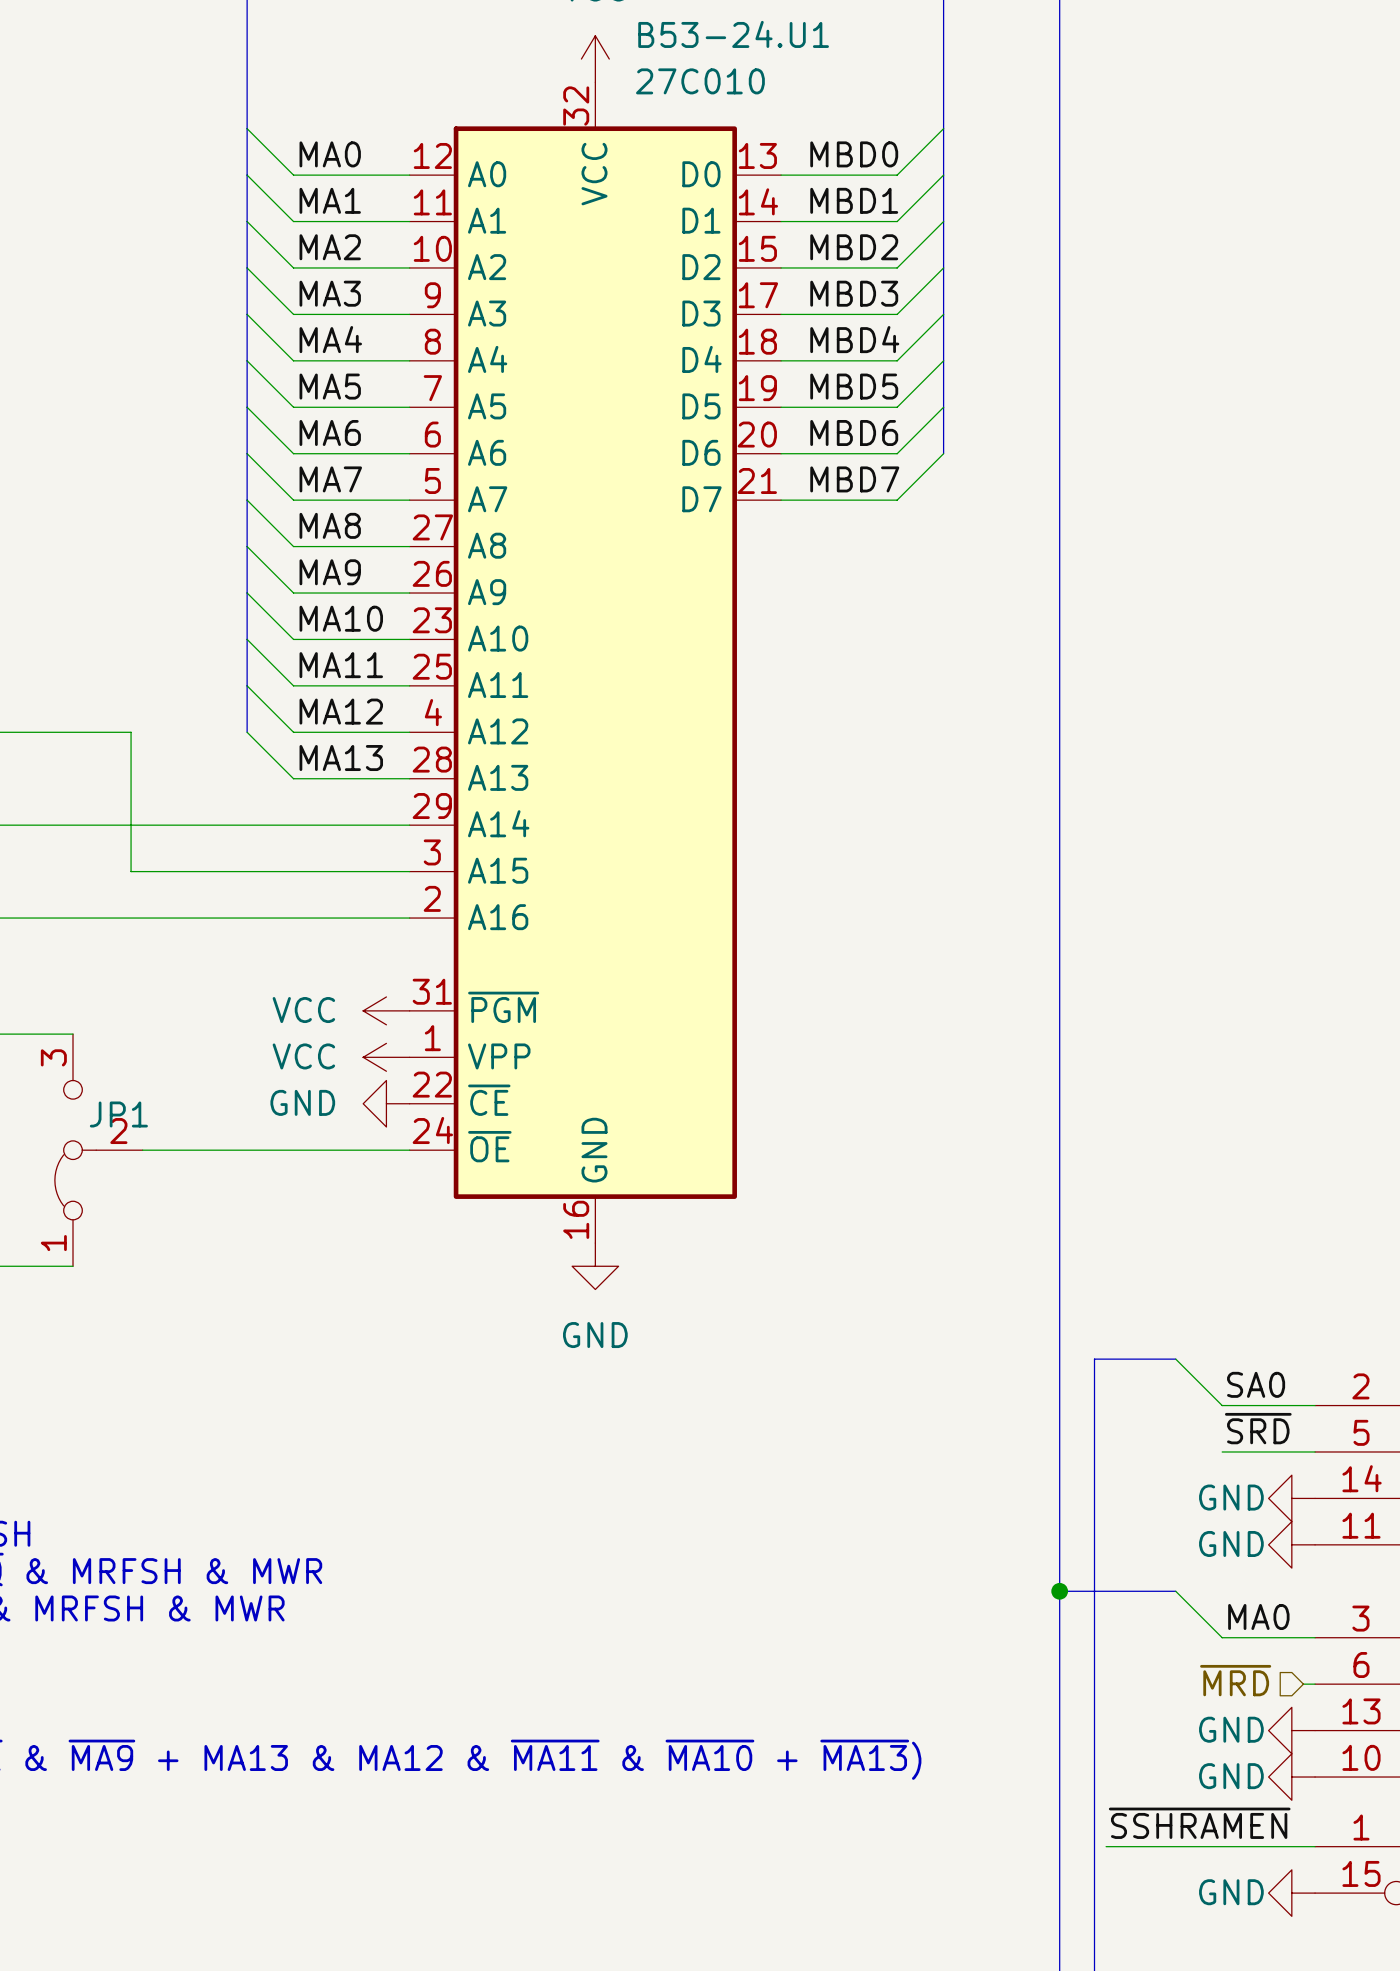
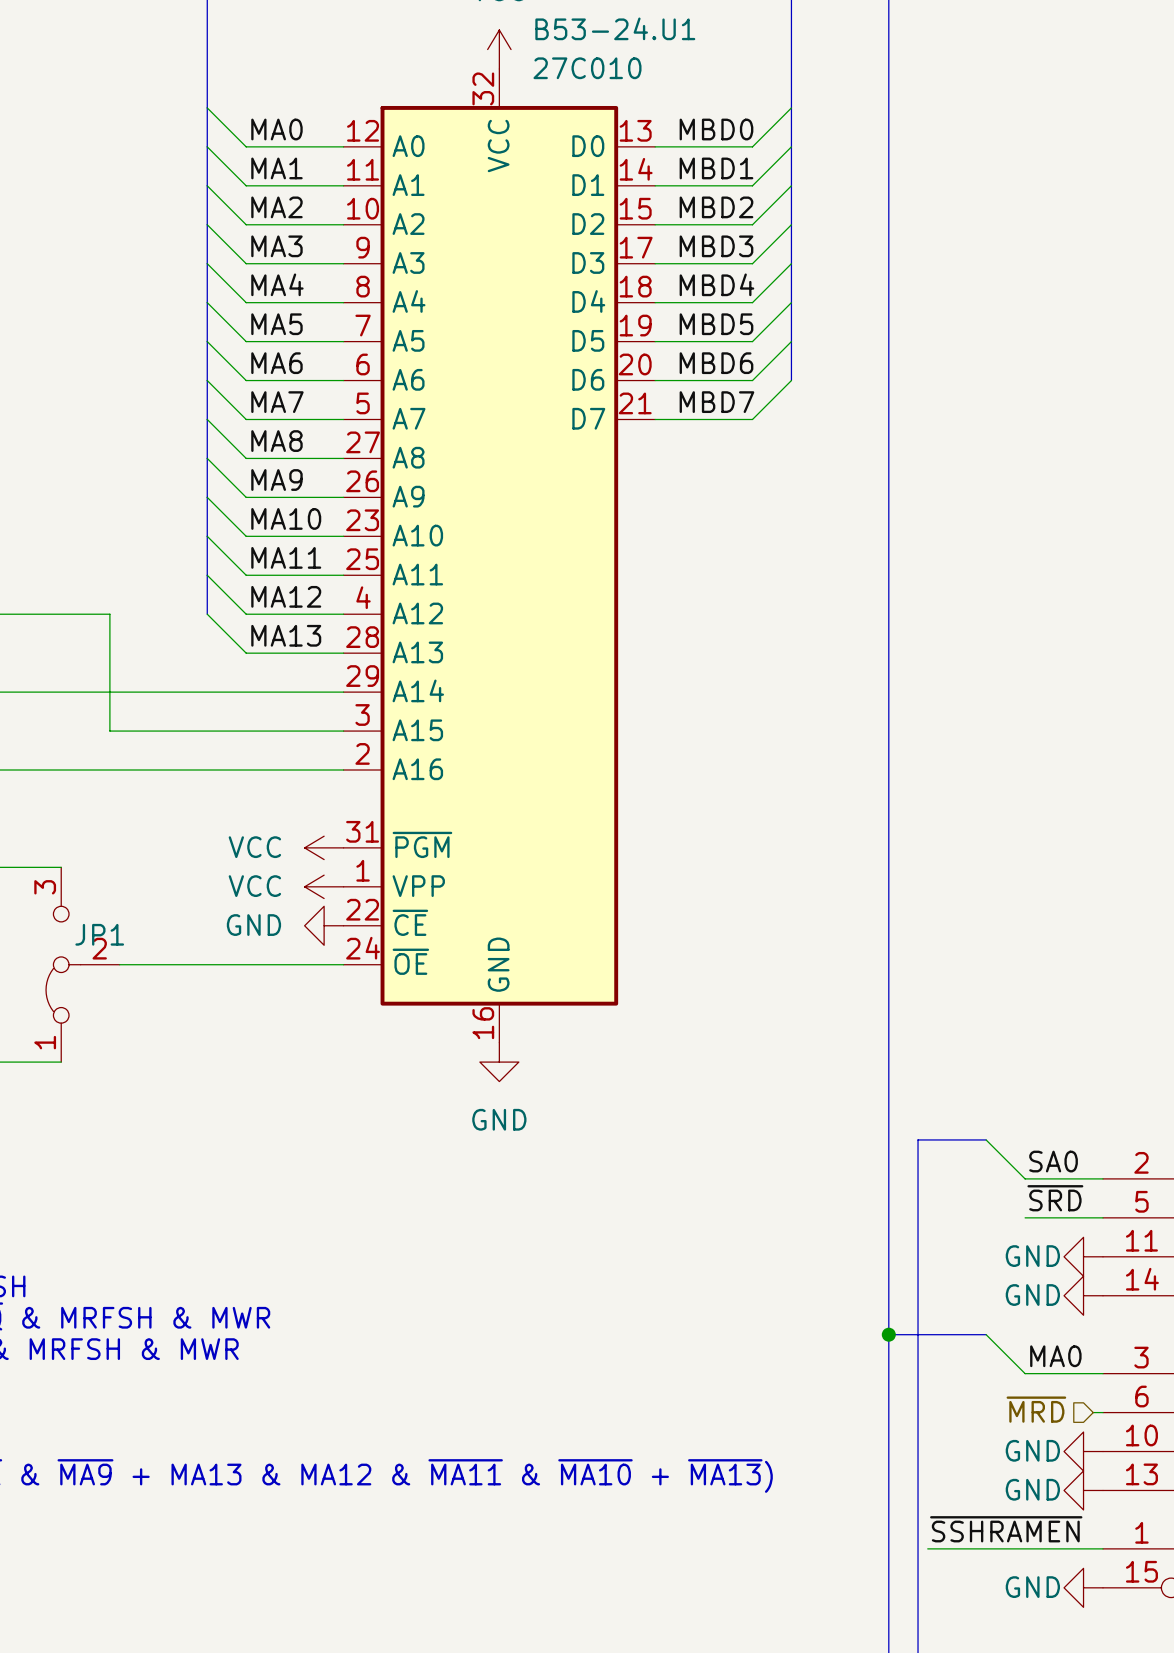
part pin number: 14 (1362, 1478) -> 11 (1141, 1240)
part pin number: 11 (1361, 1525) -> 14 (1142, 1279)
part pin number: 13 (1361, 1711) -> 10 (1141, 1435)
part pin number: 10 (1361, 1757) -> 13 (1141, 1474)

